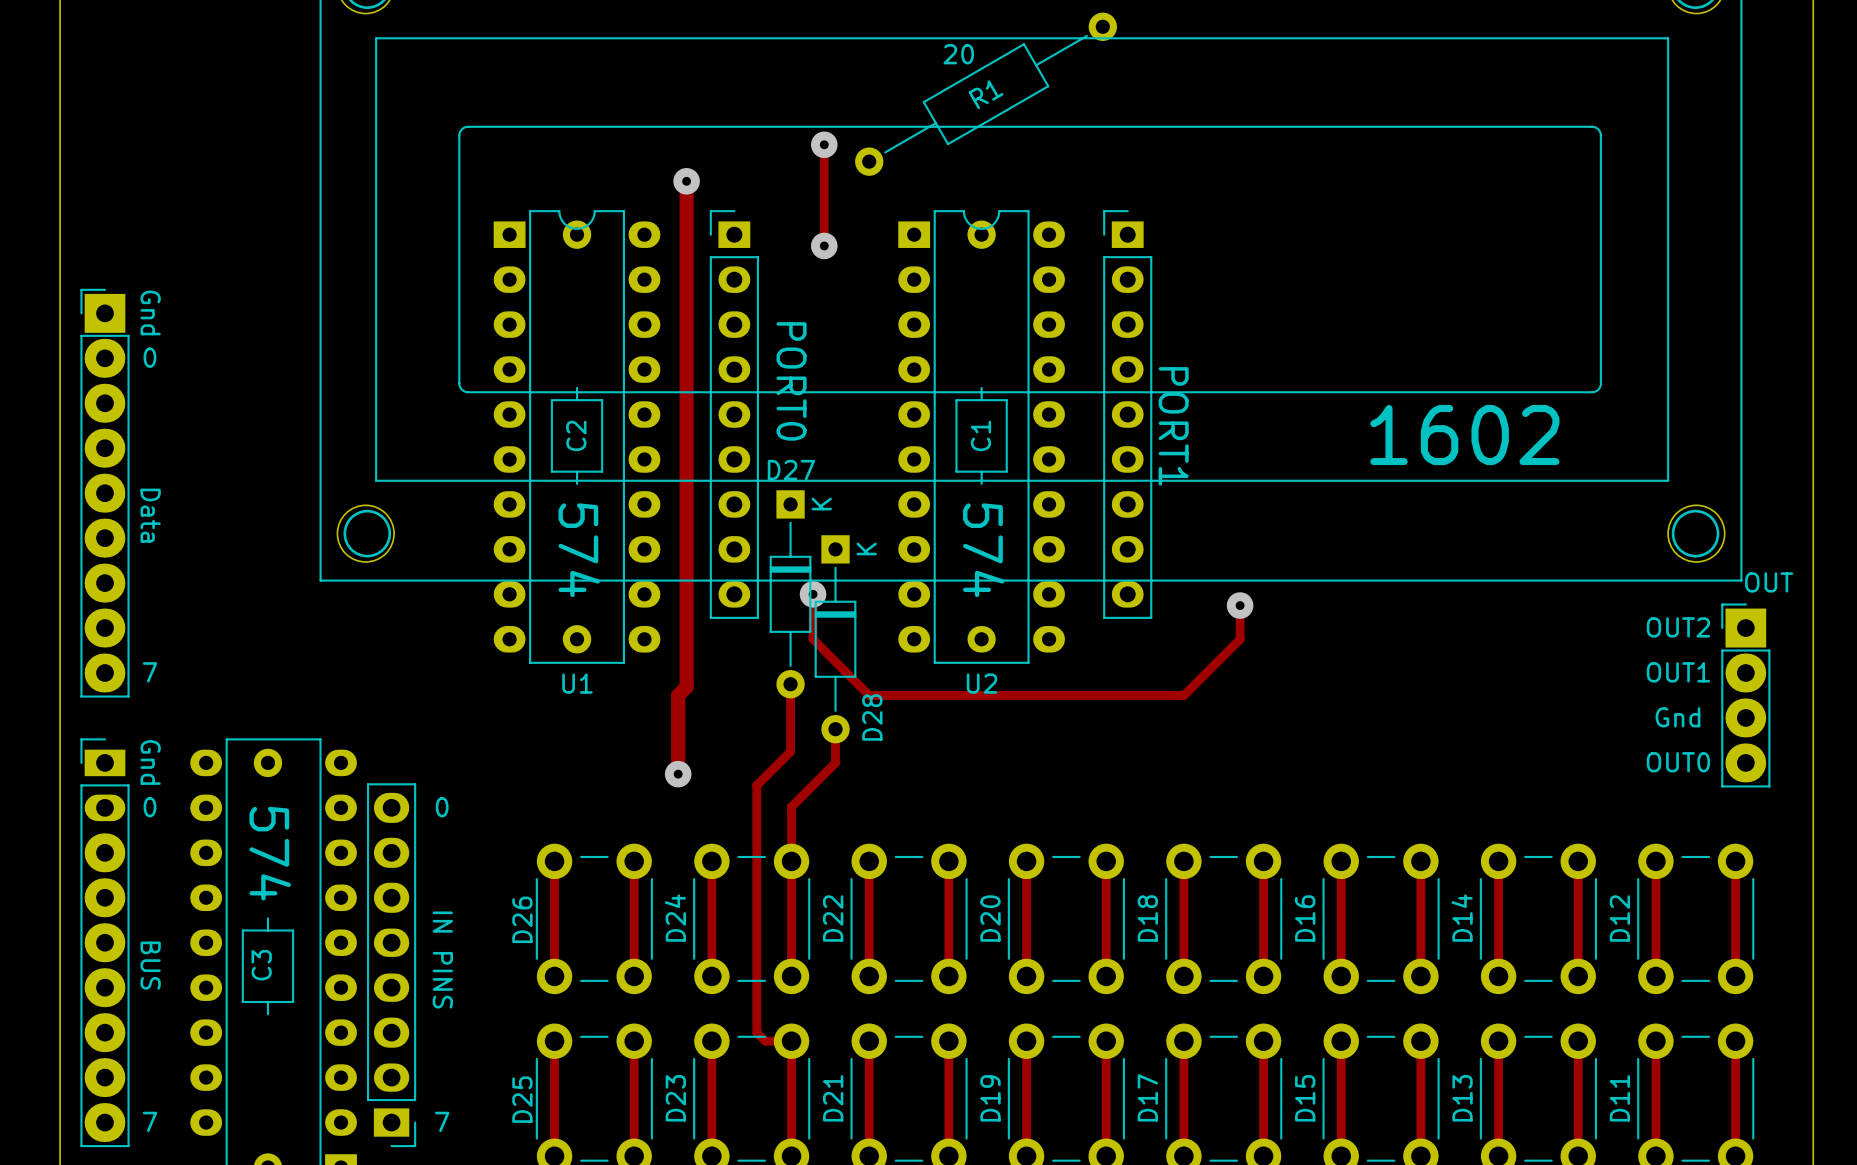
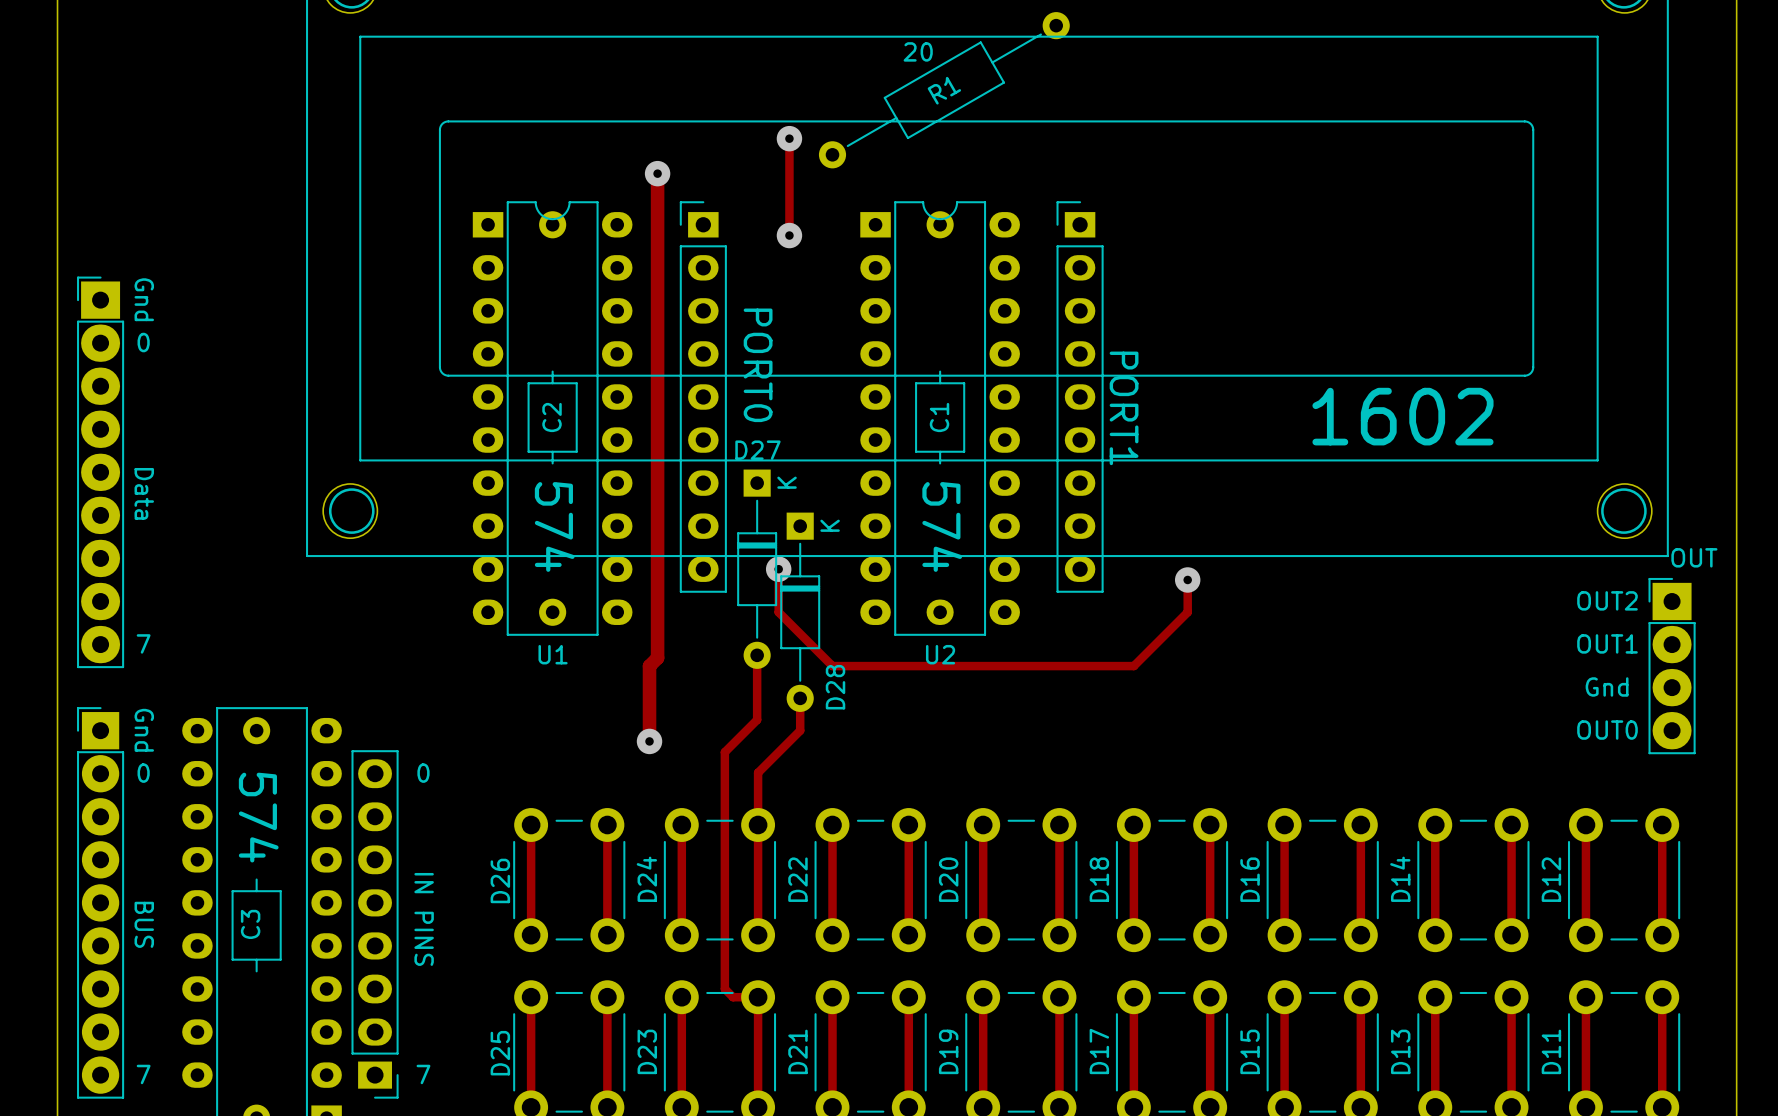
part footprint: [80, 738, 130, 1148] -> [77, 707, 125, 1099]

